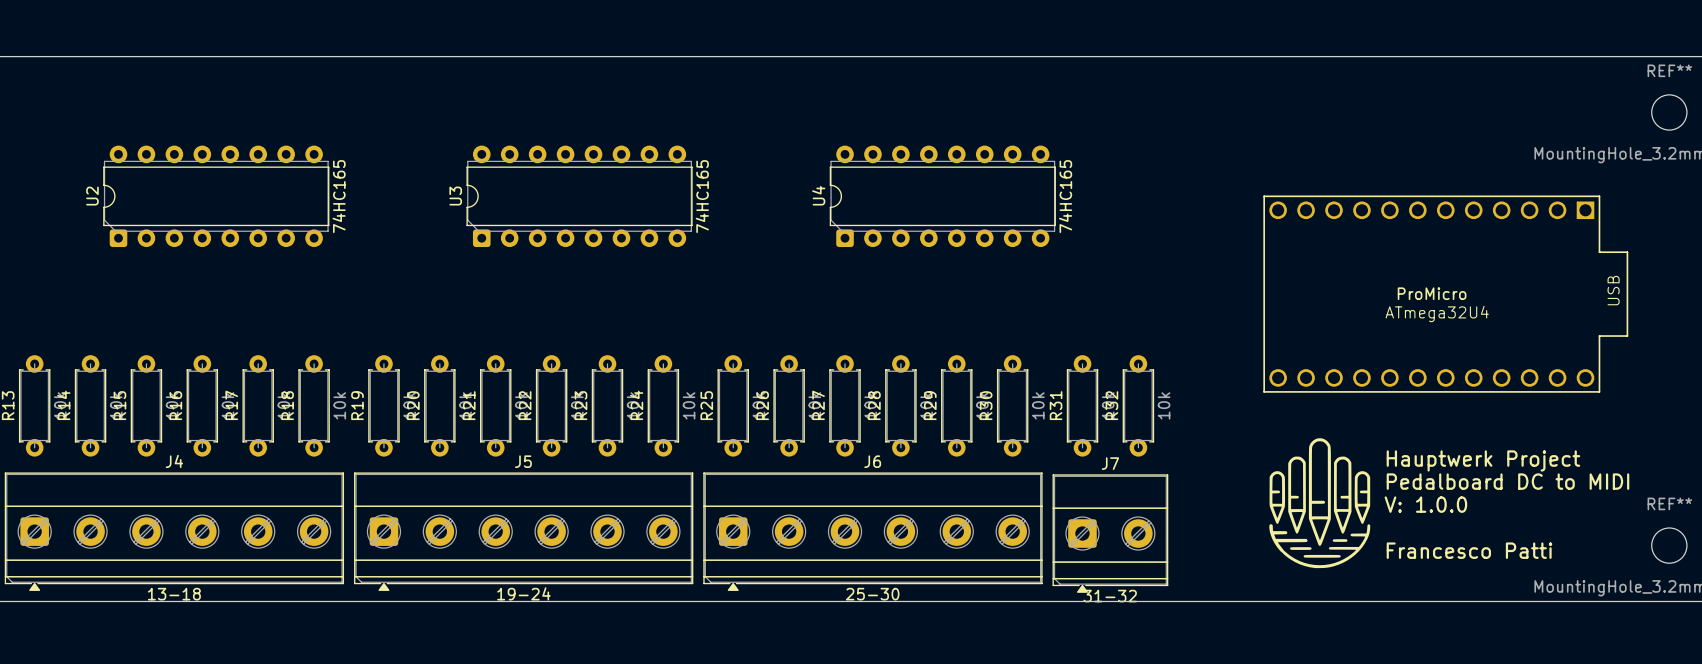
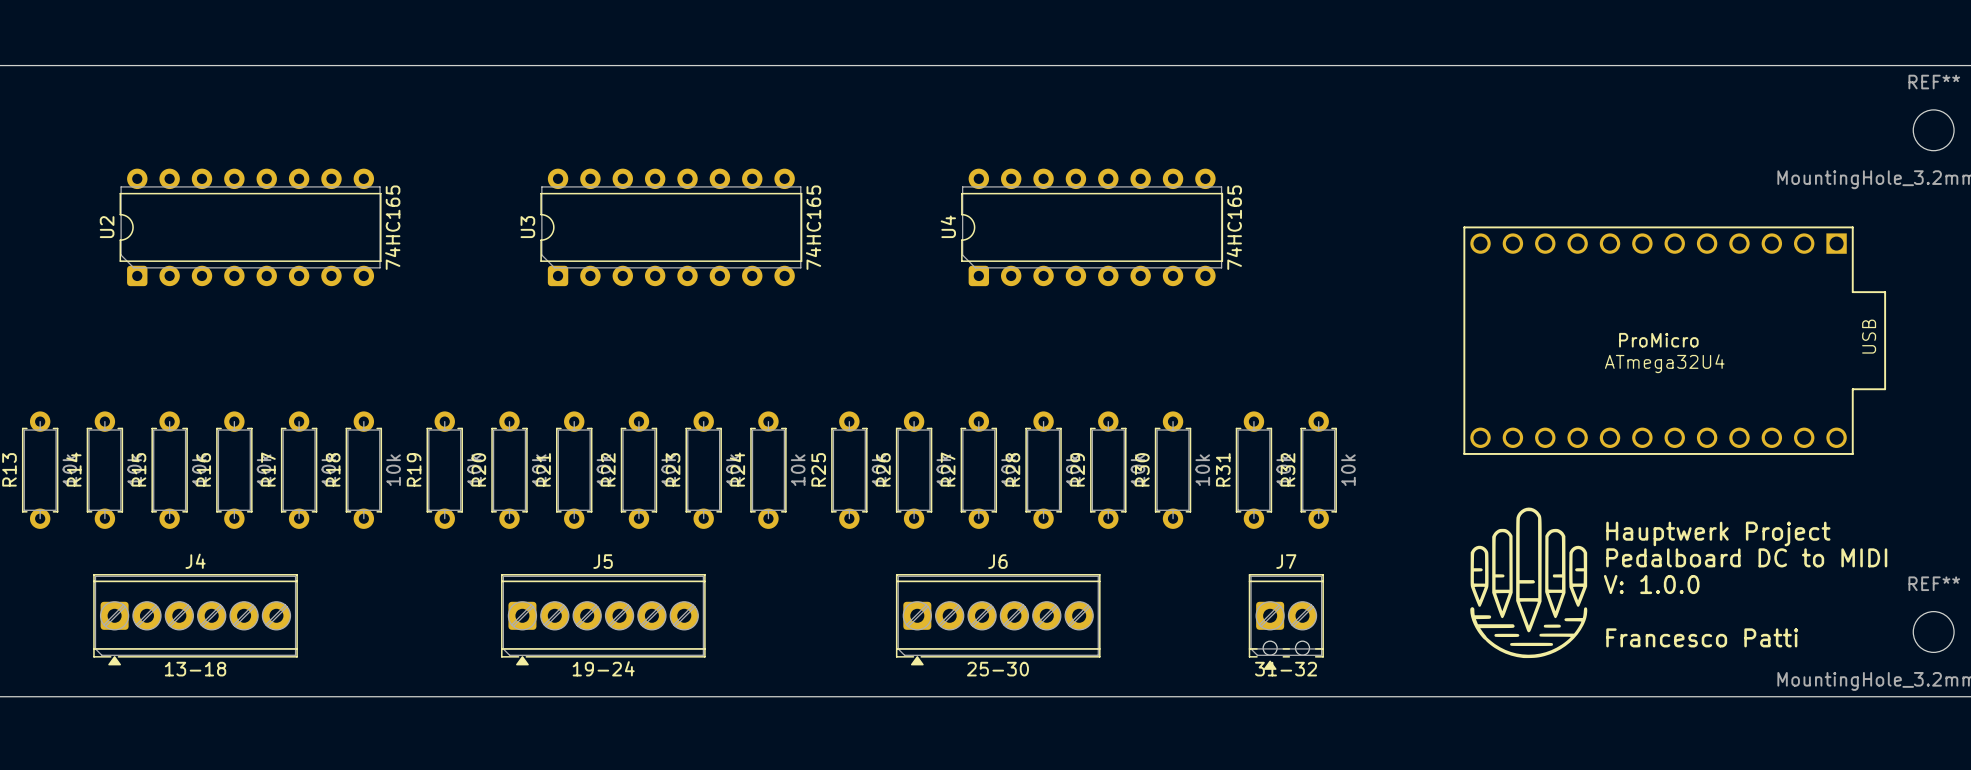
J4 footprint: [4, 472, 345, 591] -> [93, 574, 298, 666]
J5 footprint: [354, 472, 694, 591] -> [501, 574, 706, 666]
J6 footprint: [703, 472, 1043, 591] -> [895, 574, 1101, 666]
J7 footprint: [1052, 474, 1169, 593] -> [1248, 574, 1324, 670]

